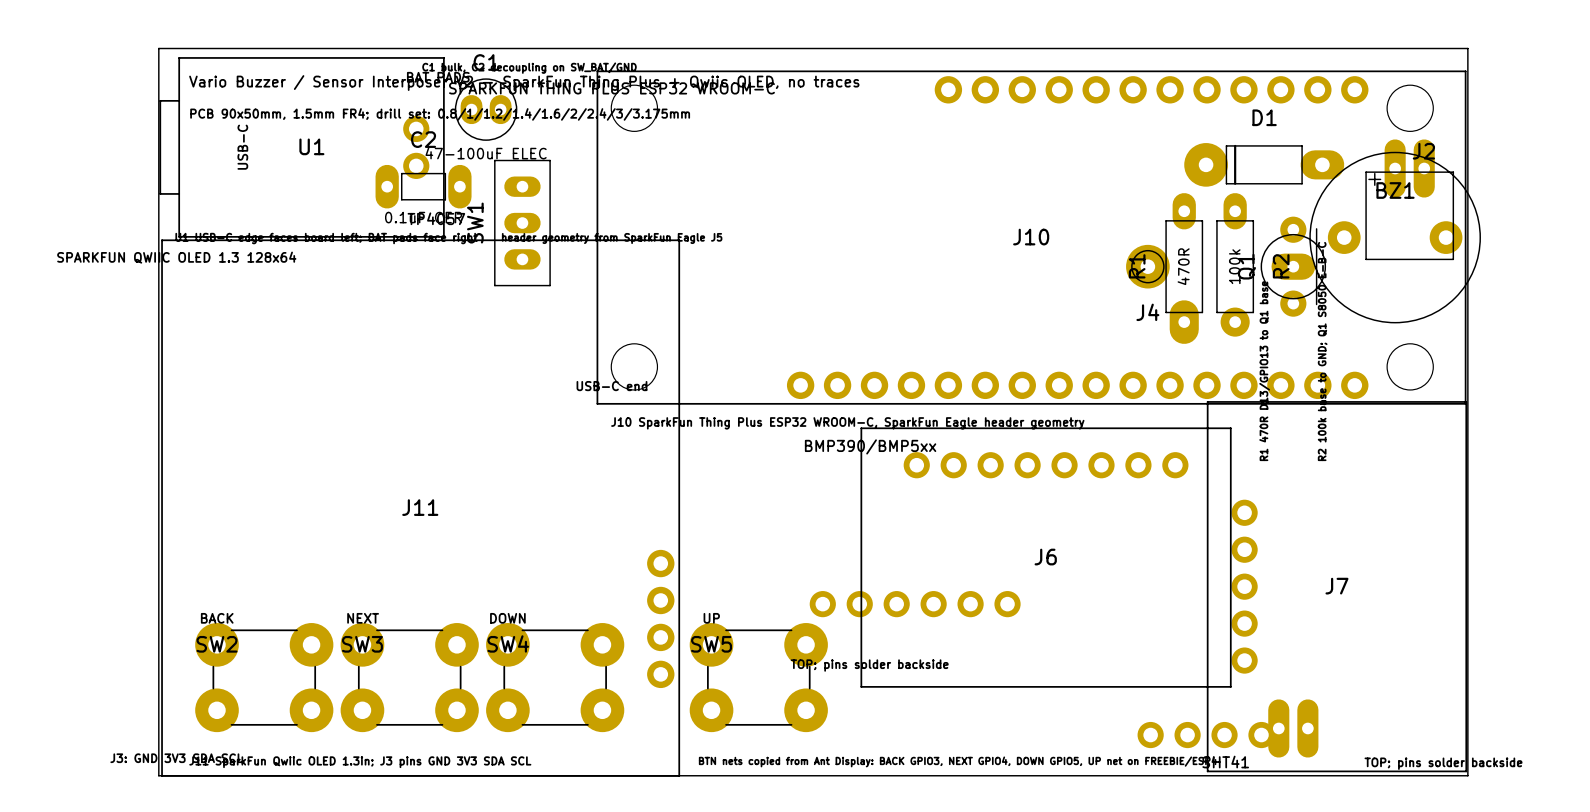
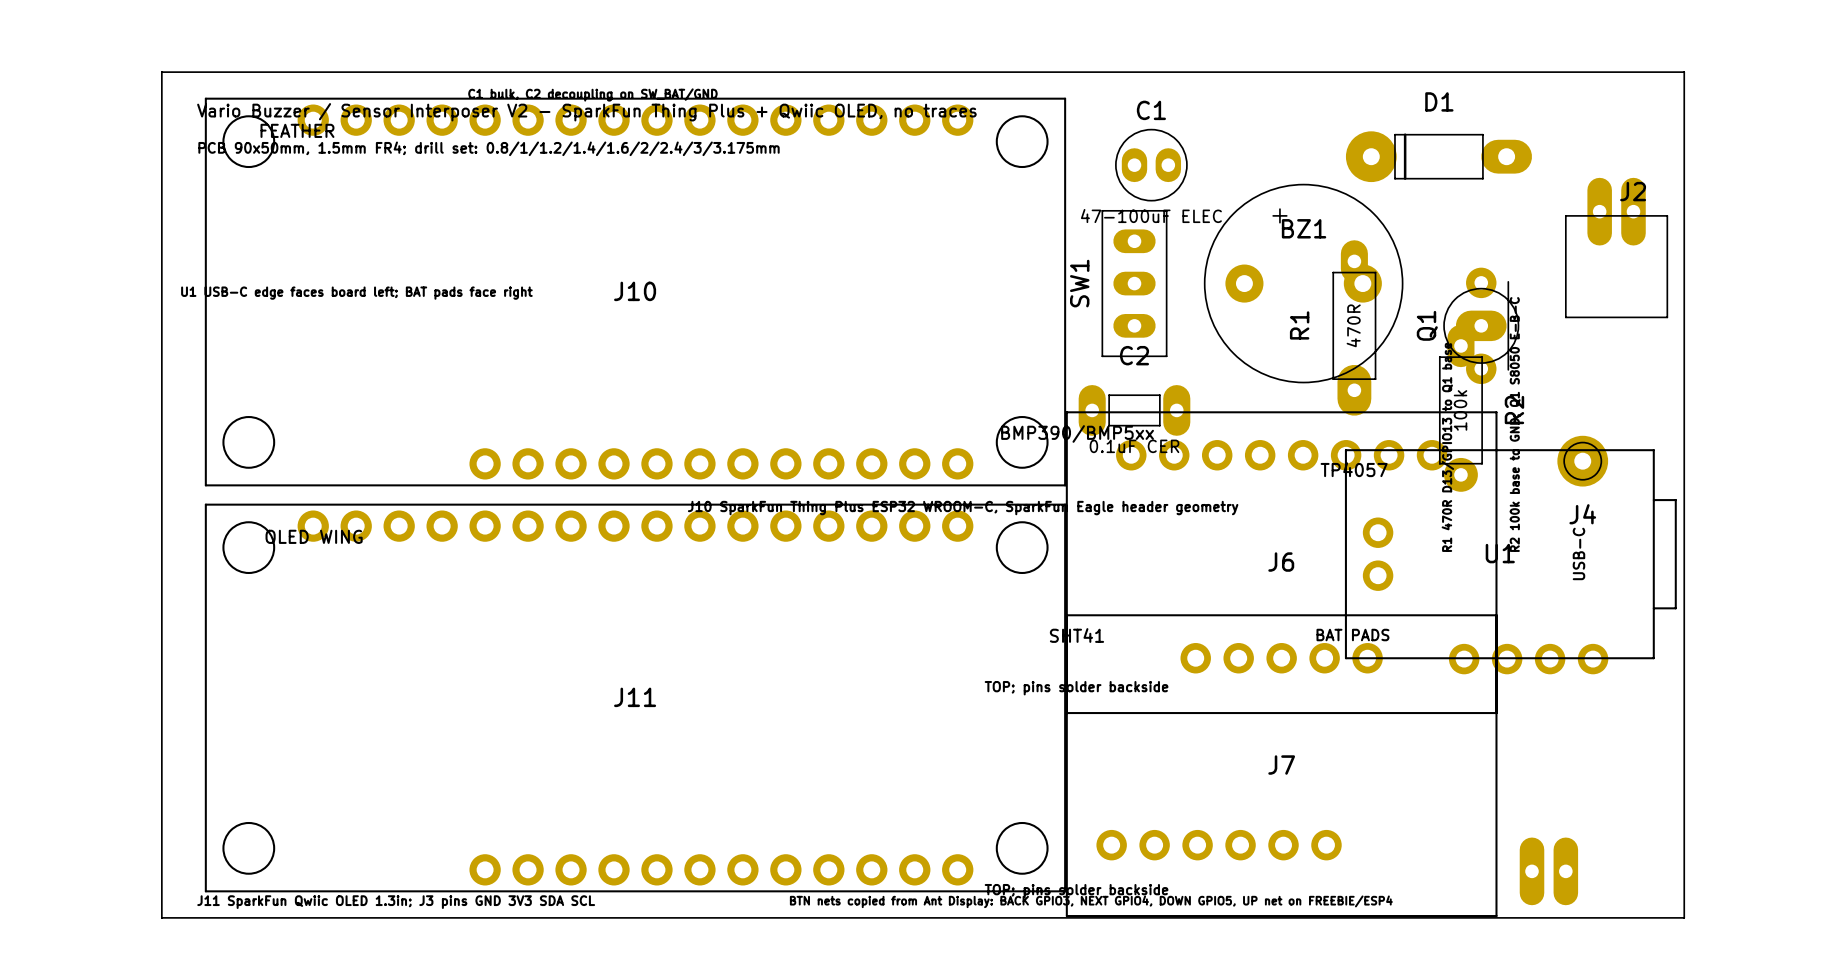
J10 footprint: [596, 70, 1467, 405] -> [204, 97, 1067, 487]
C1 position: (486, 109) -> (1151, 165)
U1 rotation: 0° (302, 147) -> 180° (1510, 554)
U1 position: (302, 147) -> (1510, 554)
D1 position: (1264, 164) -> (1438, 156)
C2 position: (423, 186) -> (1134, 410)
SW1 position: (522, 223) -> (1134, 283)
BZ1 position: (1395, 237) -> (1303, 283)
J11 footprint: [161, 239, 681, 777] -> [204, 503, 1067, 893]
R2 position: (1235, 264) -> (1460, 408)
J4 position: (1147, 266) -> (1582, 461)
J6 position: (1046, 557) -> (1281, 562)
J7 rotation: 0° (1336, 586) -> 90° clockwise (1281, 765)
J7 position: (1336, 586) -> (1281, 765)
part position: (915, 604) -> (1219, 845)
SW2: (264, 677) -> none
SW3: (409, 677) -> none
SW4: (555, 677) -> none
SW5: (758, 677) -> none
part position: (1293, 728) -> (1548, 871)
part position: (1206, 735) -> (1528, 659)

